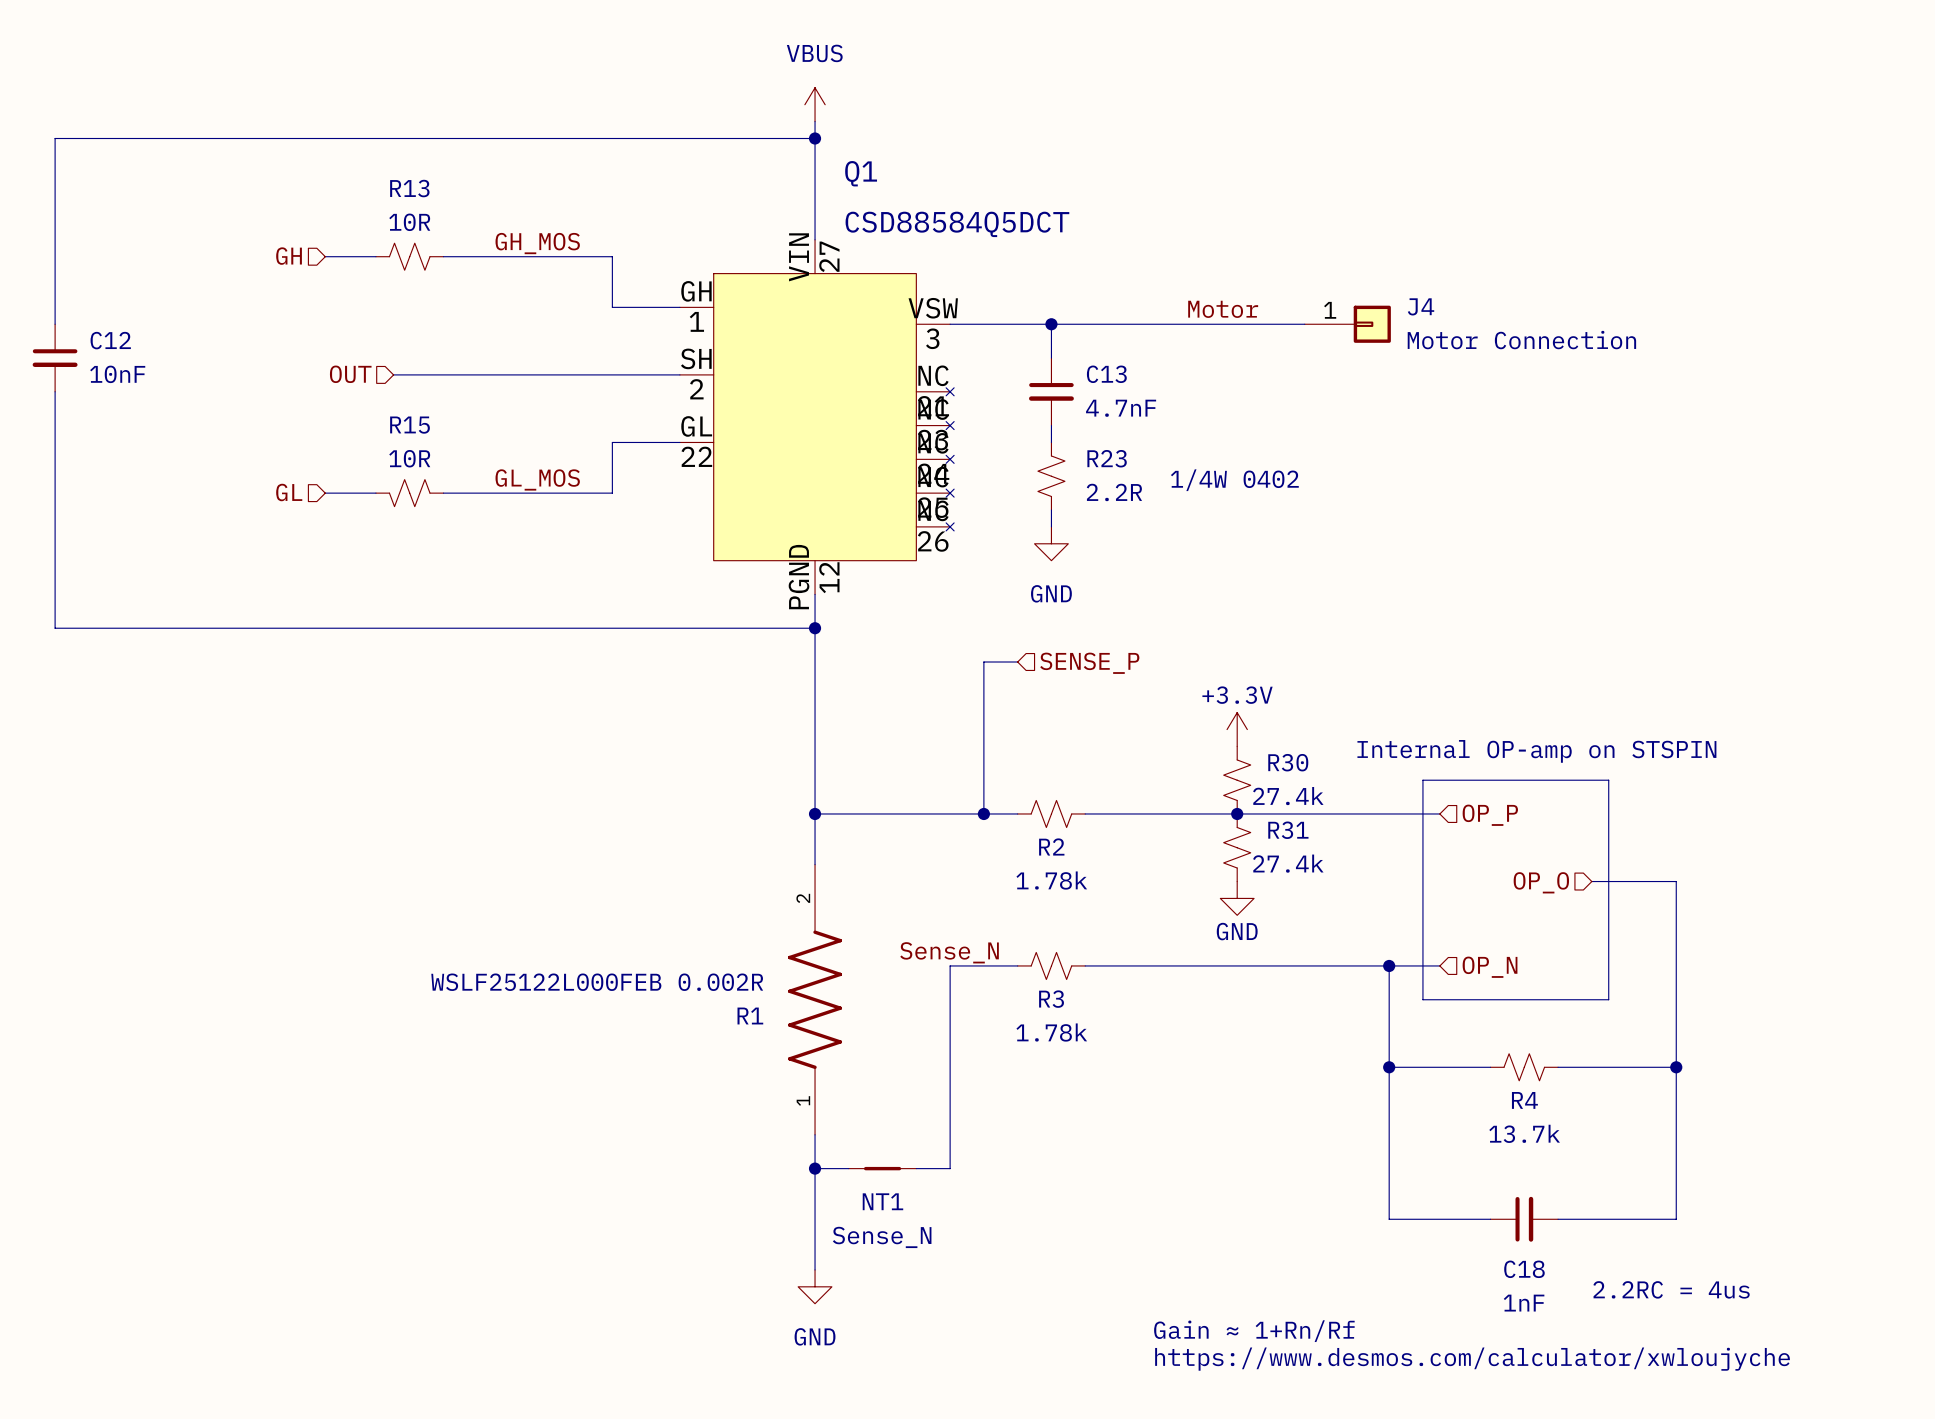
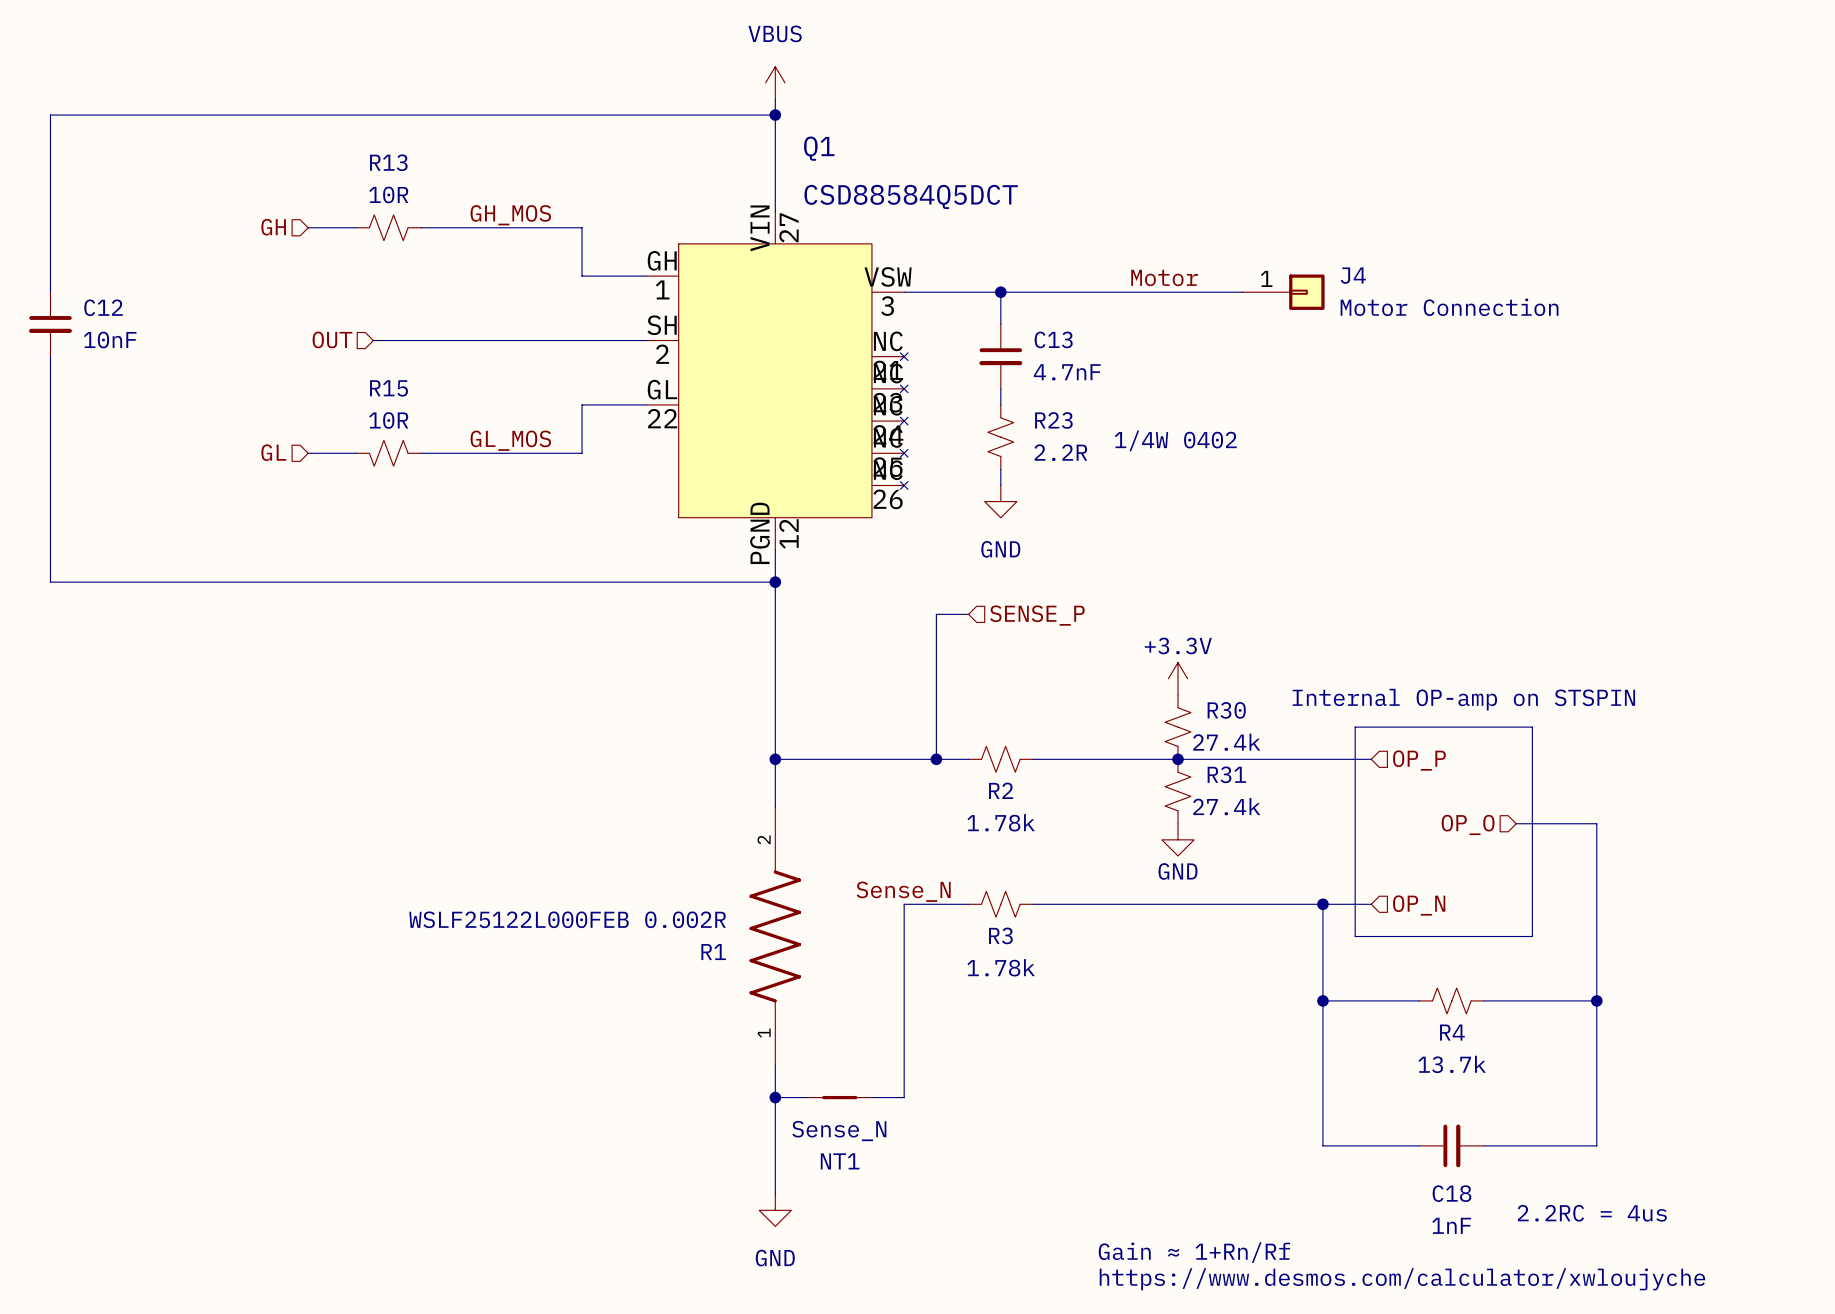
NT1 name position: NT1 (882, 1201) -> NT1 (840, 1161)
NT1 value position: Sense_N (882, 1237) -> Sense_N (839, 1131)

